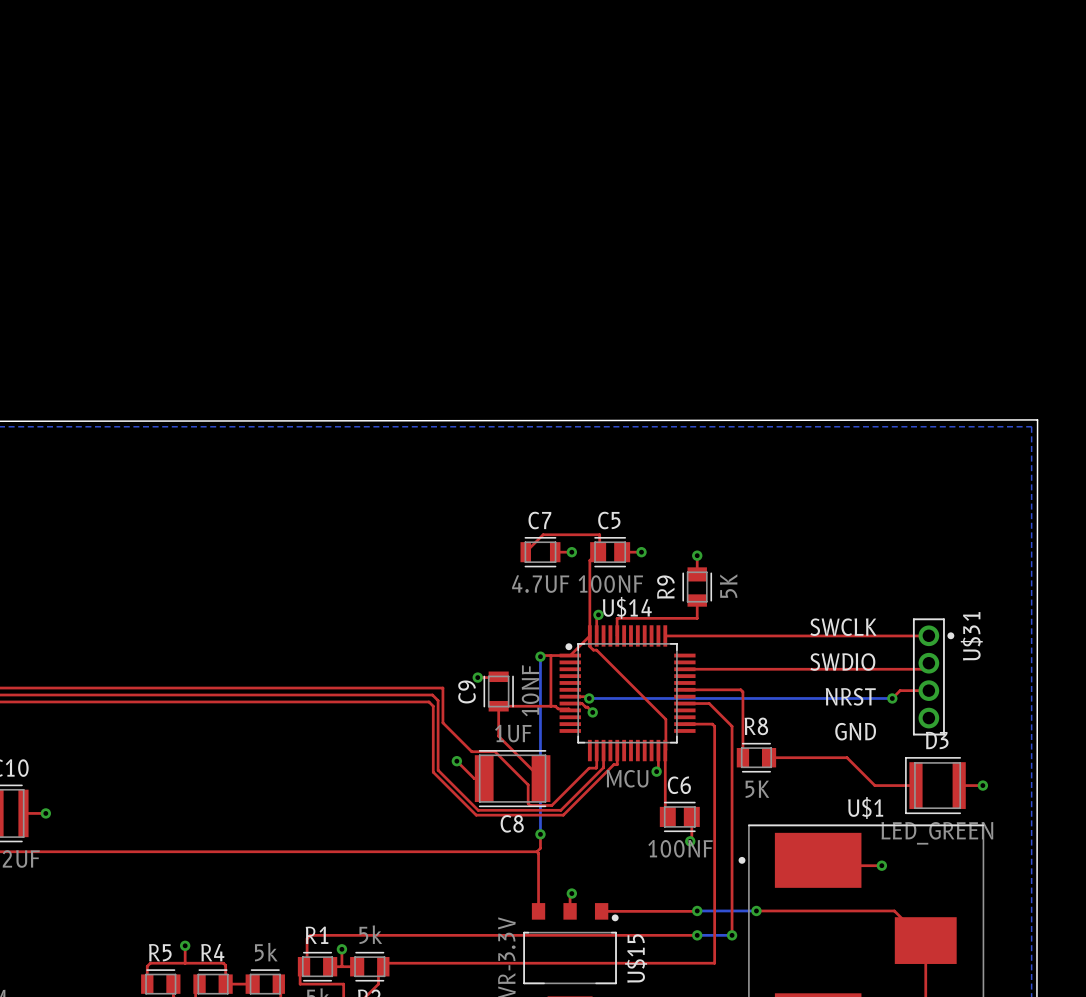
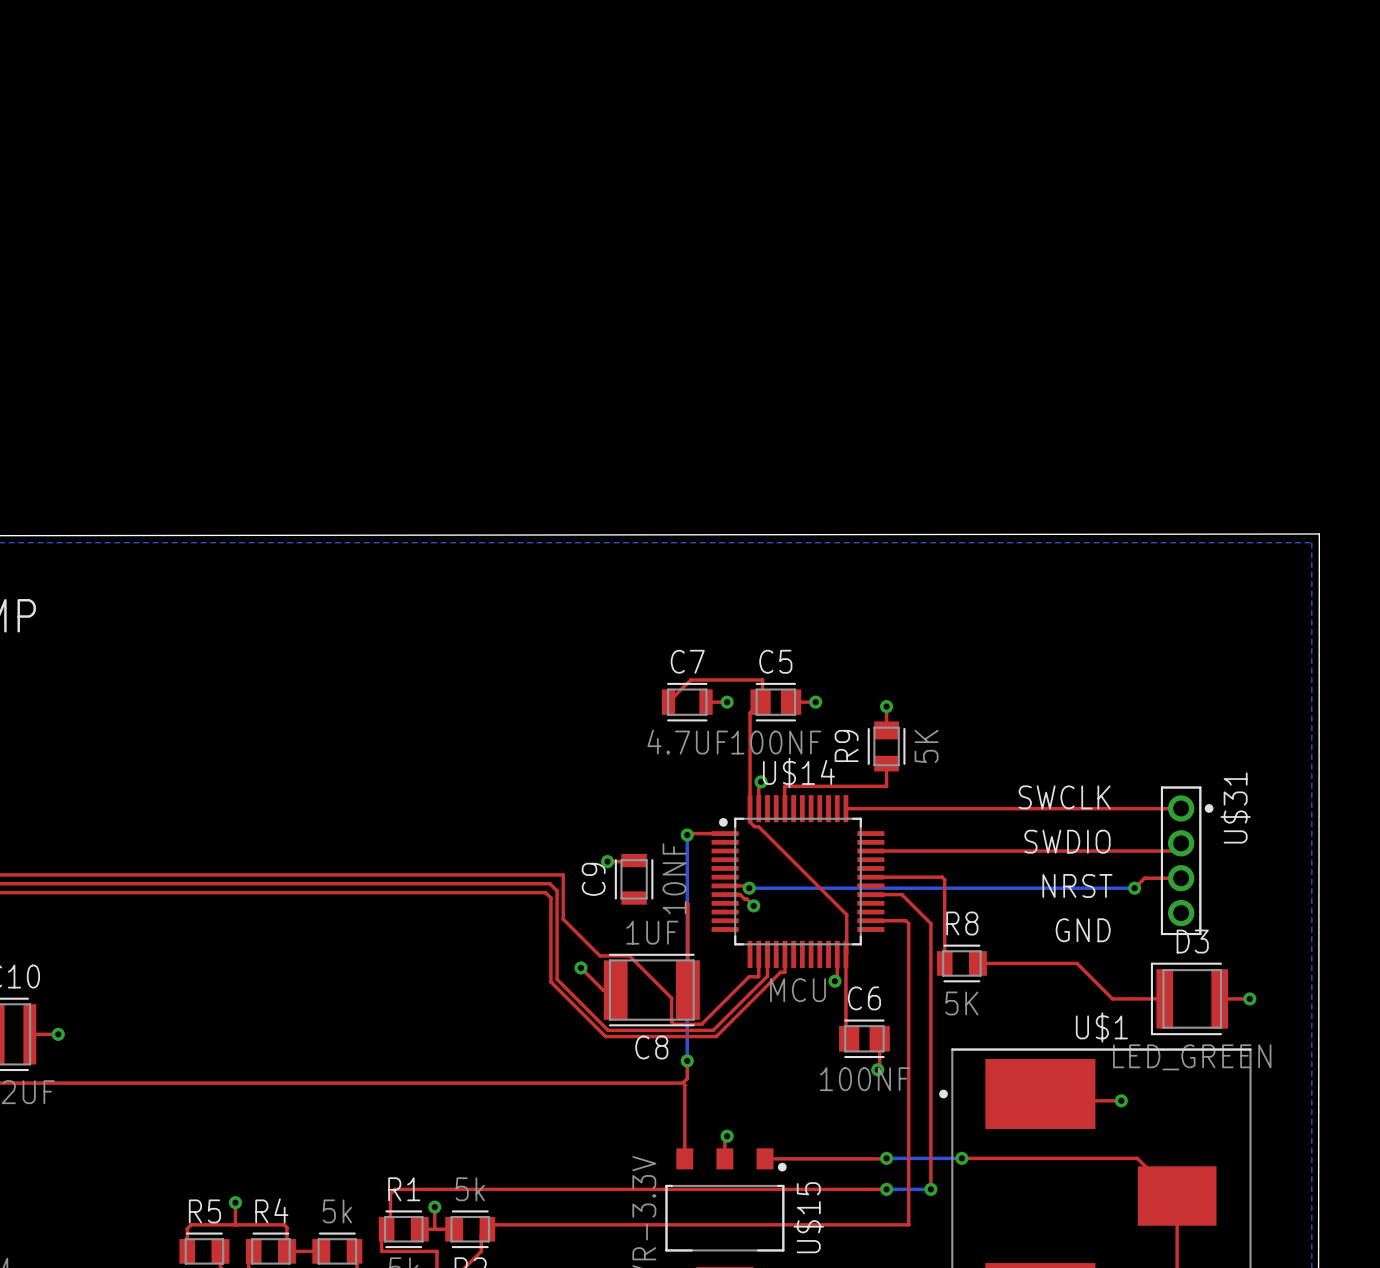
top track: (589, 635) (570, 655) -> none
top track: (550, 655) (550, 706) -> none
top track: (570, 710) (558, 708) (555, 706) (498, 706) (498, 736) (541, 778) -> (687, 903) (687, 990)

